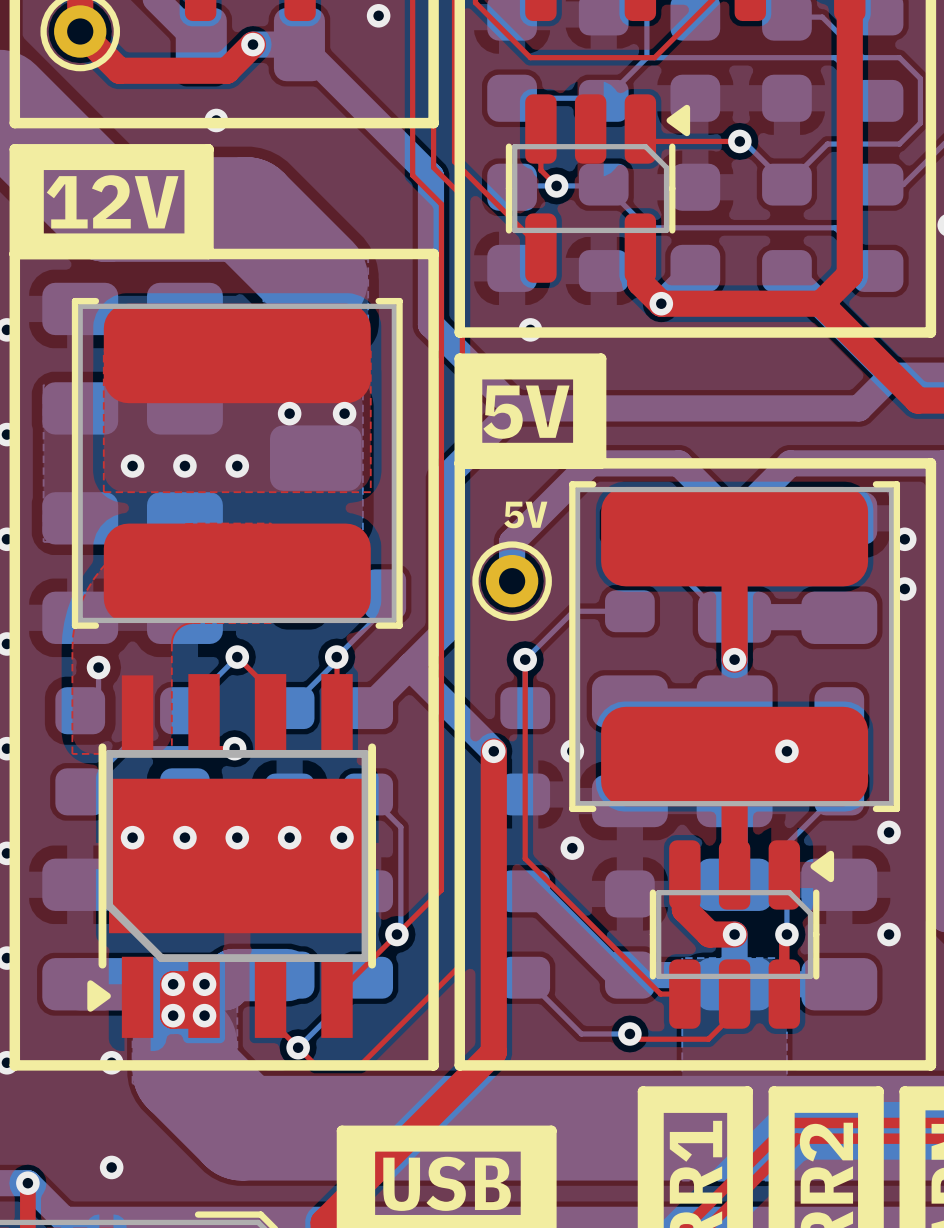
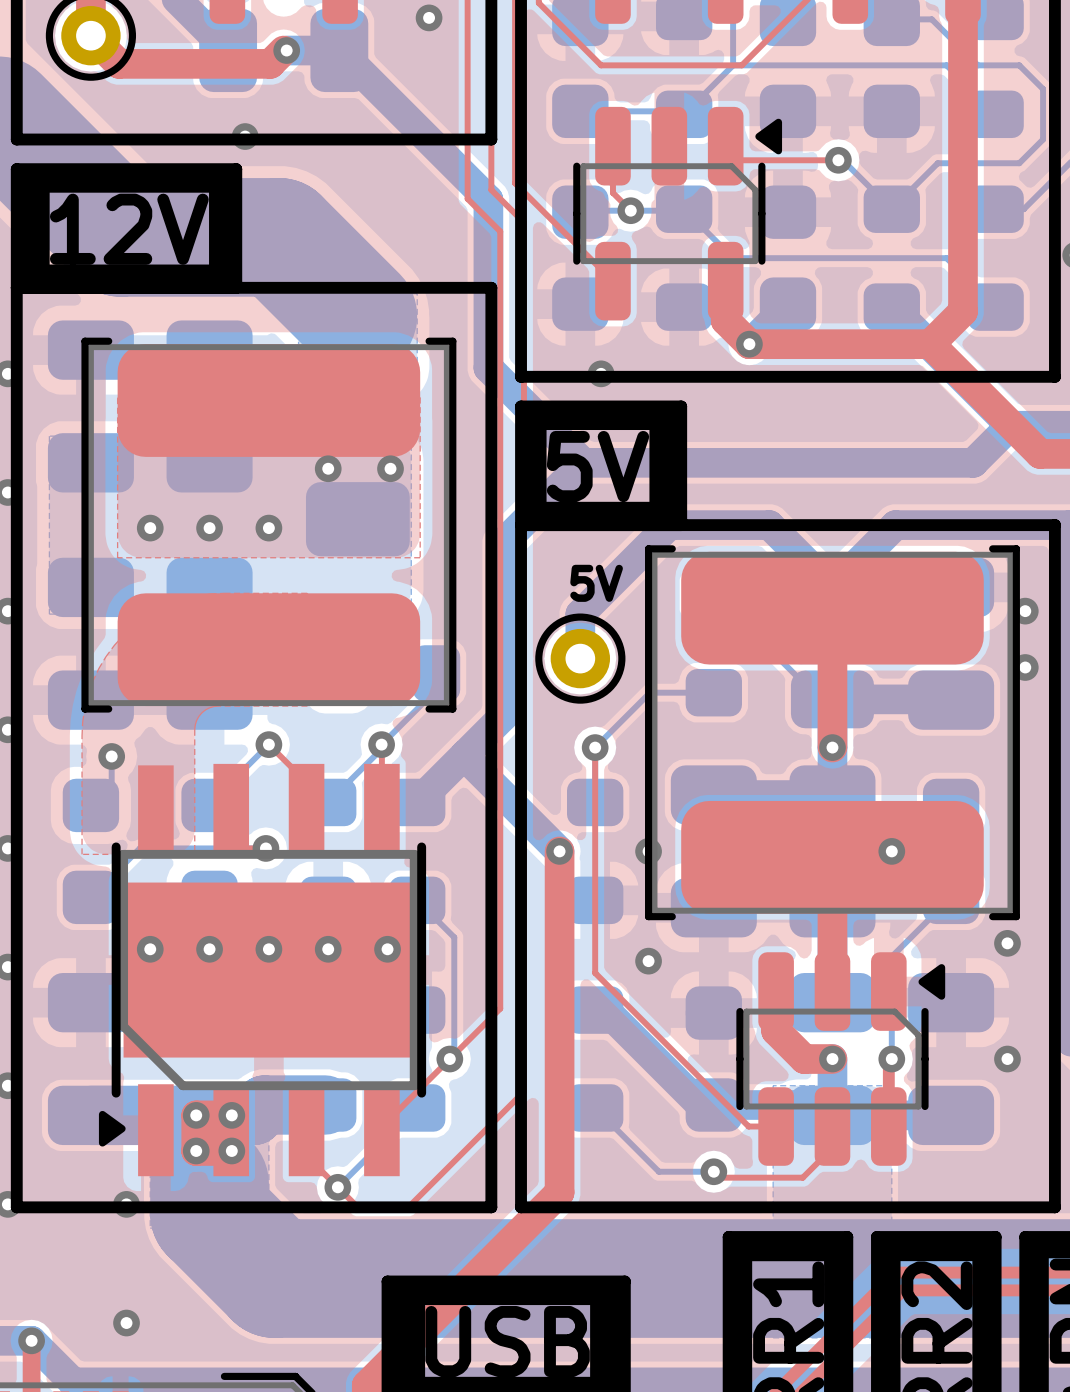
top track: (252, 44) (226, 70) (119, 70) (105, 56) -> (283, 50) (270, 63) (119, 63)

